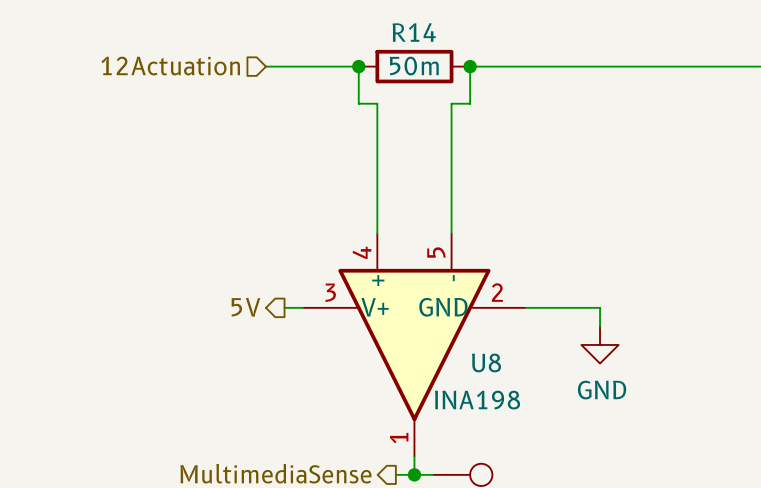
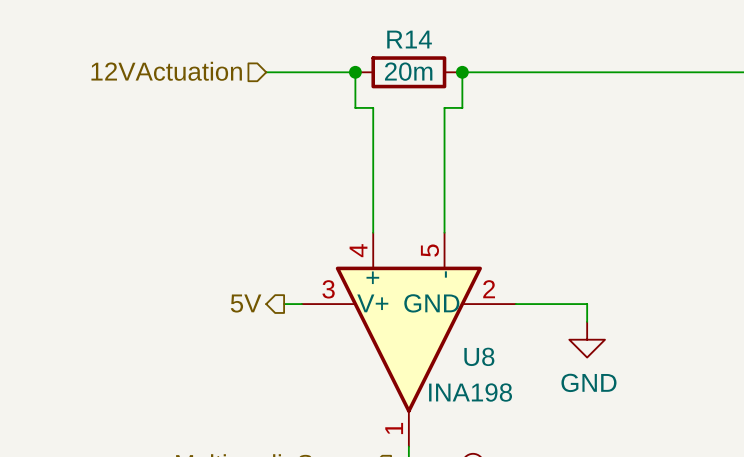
hierarchical label: 12Actuation (170, 66) -> 12VActuation (166, 71)
R14 value: 50m (414, 66) -> 20m (408, 71)

